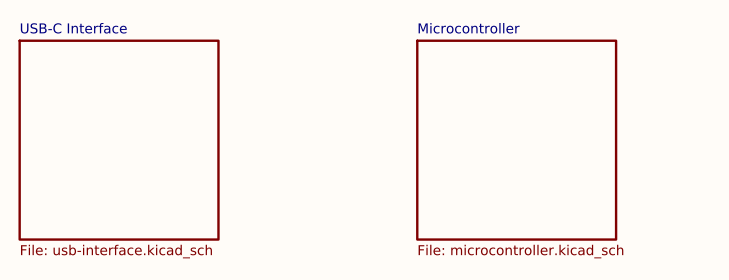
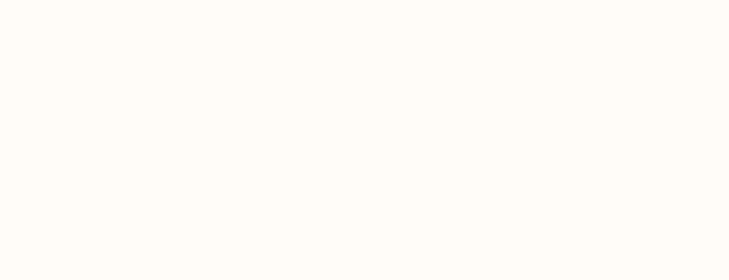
sheet USB-C Interface: File: usb-interface.kicad_sch (119, 140) -> none
sheet Microcontroller: File: microcontroller.kicad_sch (516, 140) -> none

